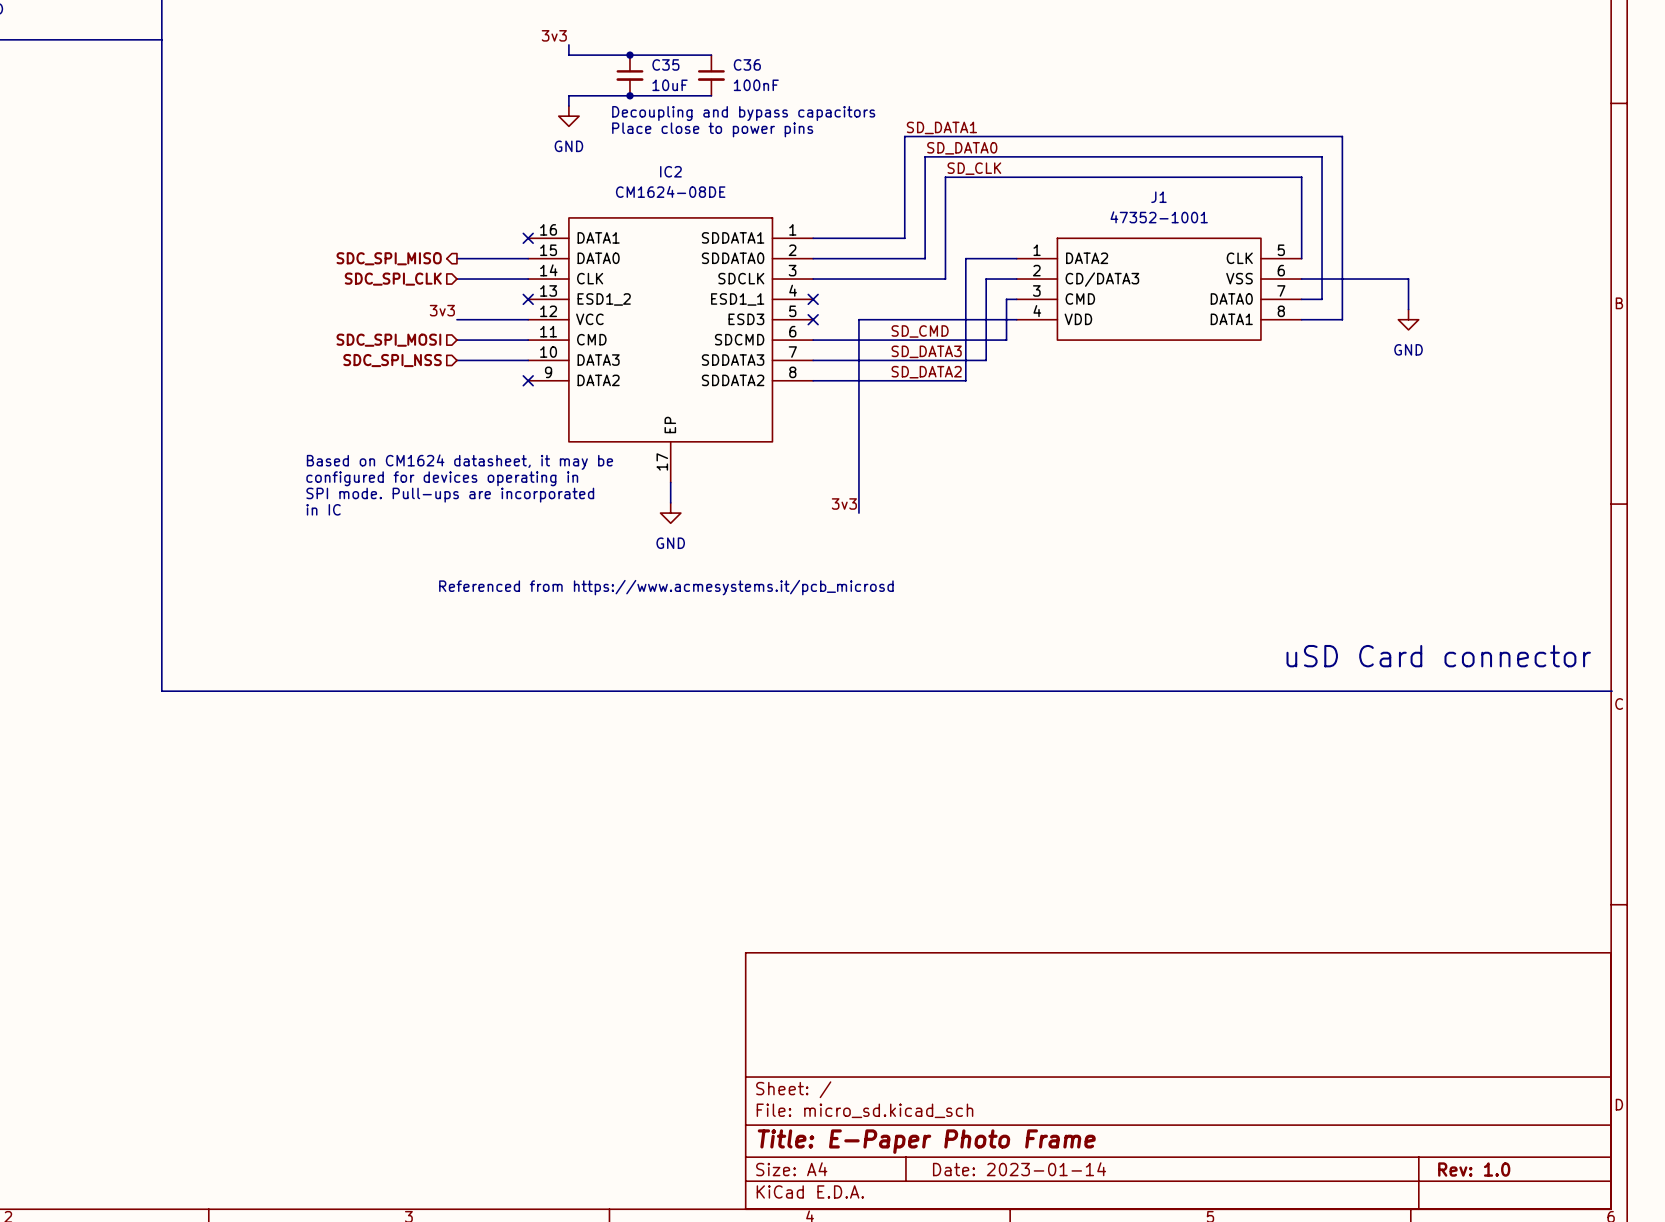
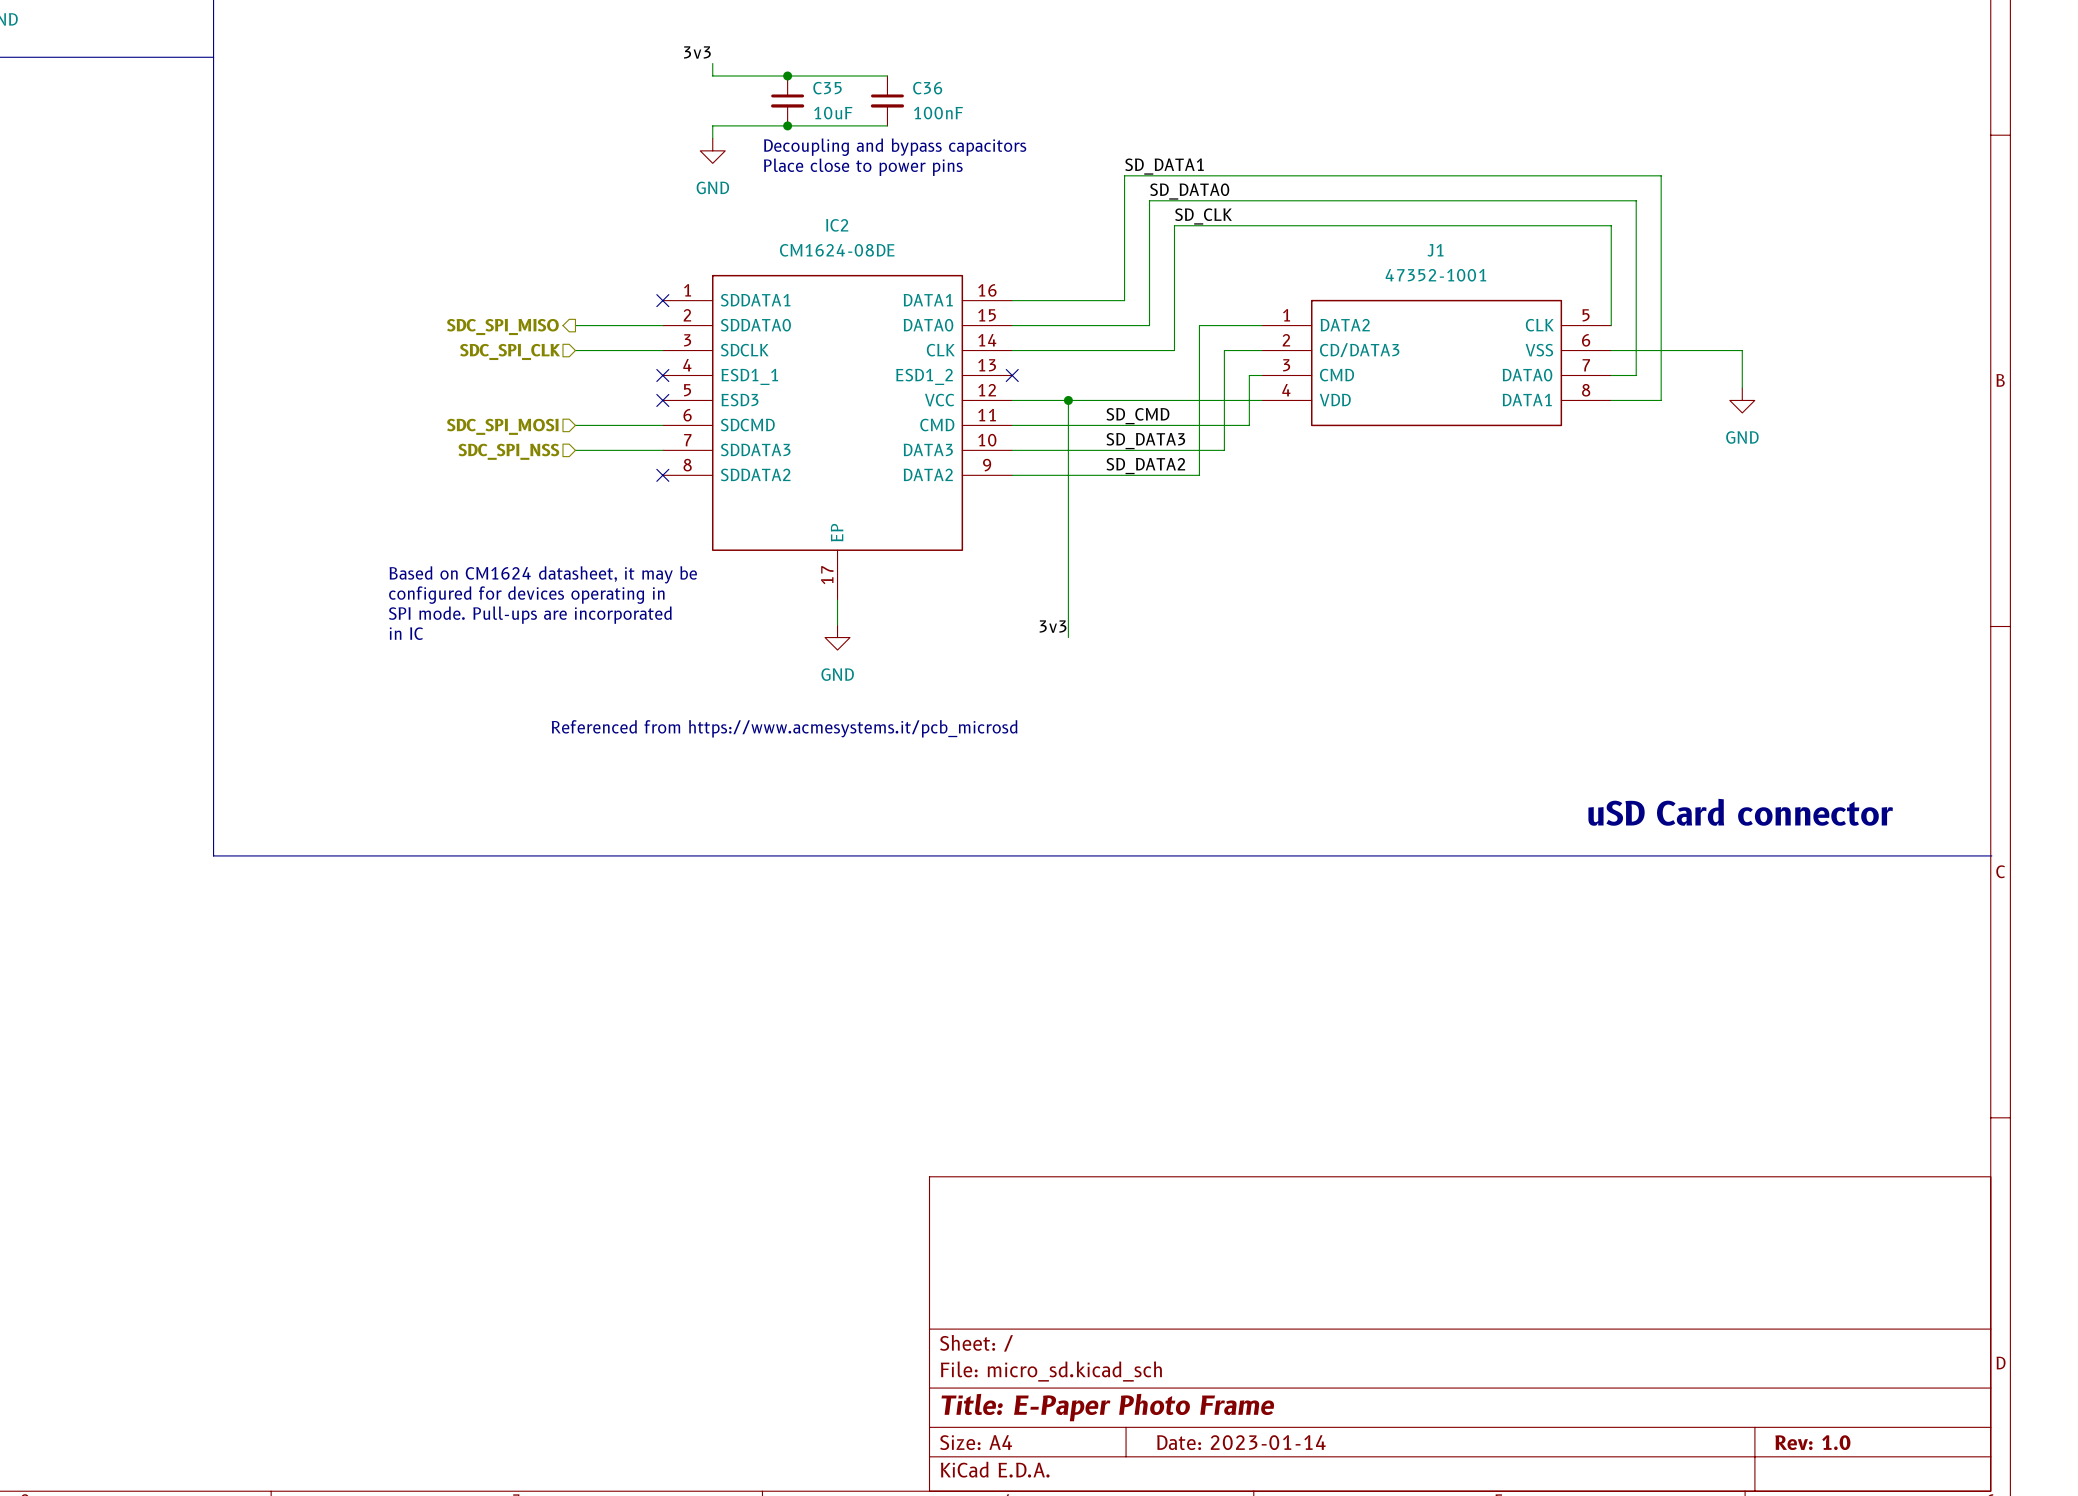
label: 3v3 (442, 310) -> none
wire: (456, 319) (528, 319) -> none
no-connect mark: none -> (662, 400)
wire: none -> (1012, 400) (1068, 400)
no-connect mark: (813, 319) -> none
junction: none -> (1068, 400)
IC2 flip: as is (670, 329) -> left-right (837, 412)

